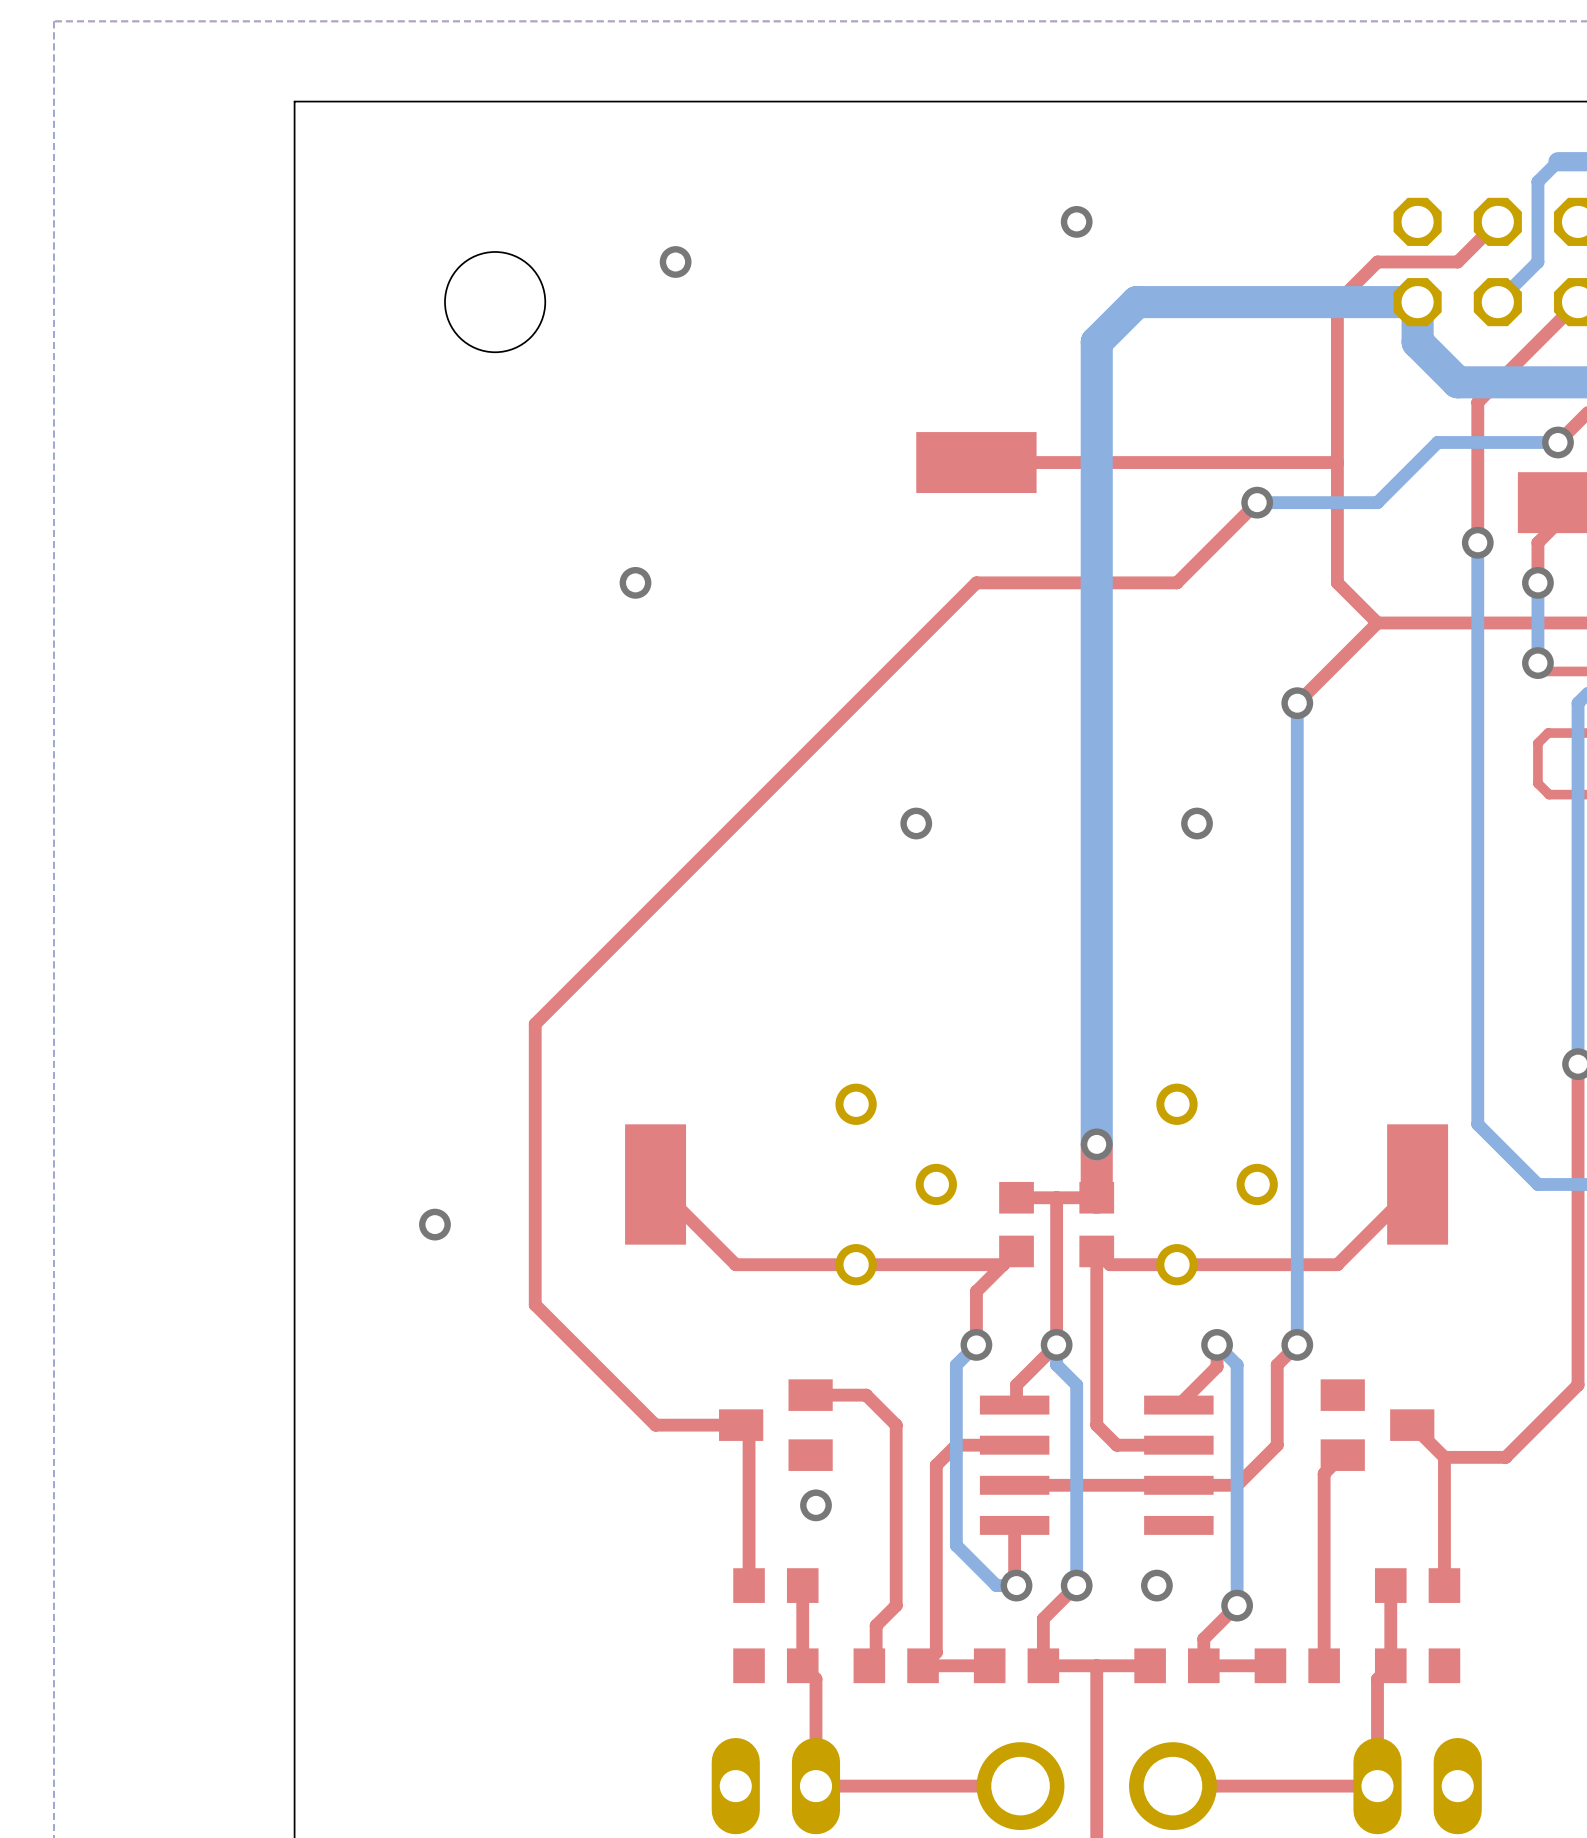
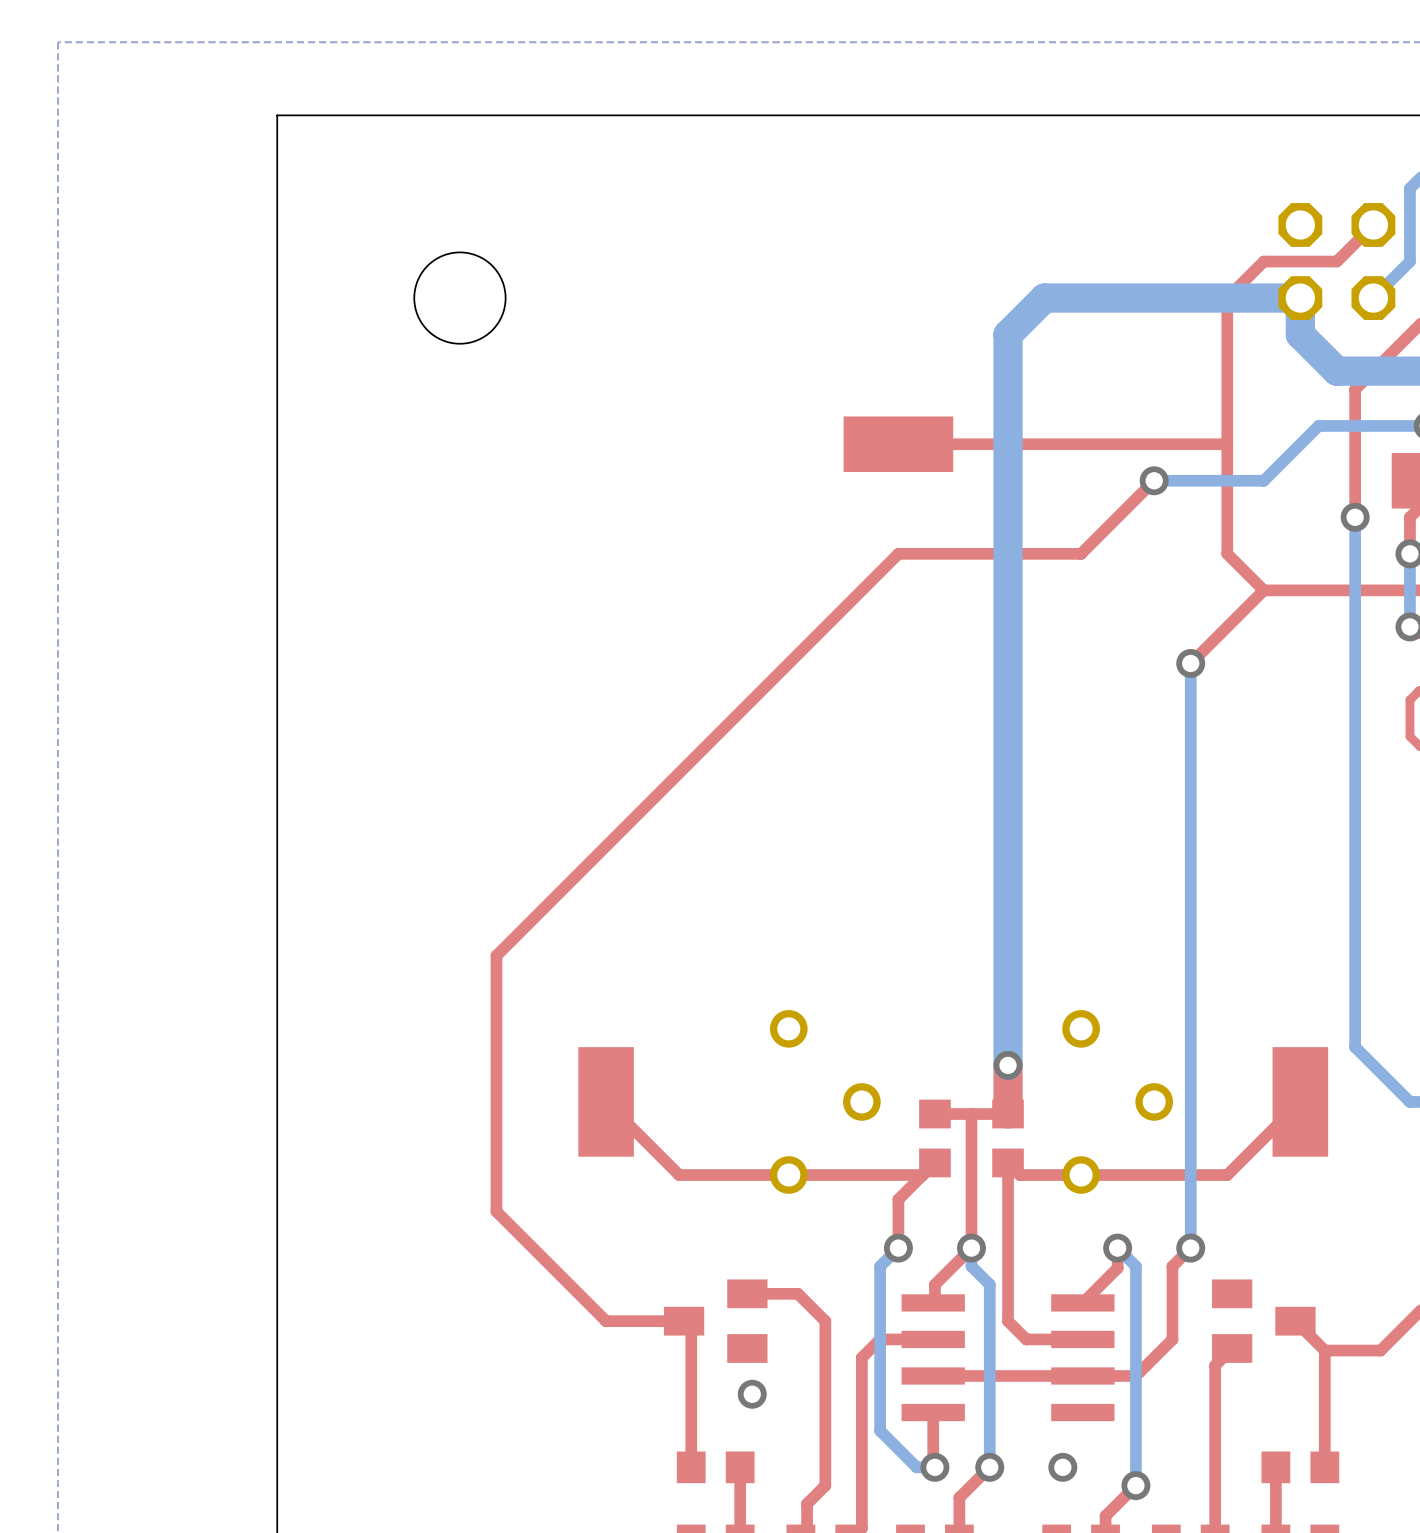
via: (1076, 221) -> none
via: (675, 262) -> none
via: (635, 582) -> none
via: (916, 823) -> none
via: (1197, 823) -> none
via: (434, 1224) -> none

